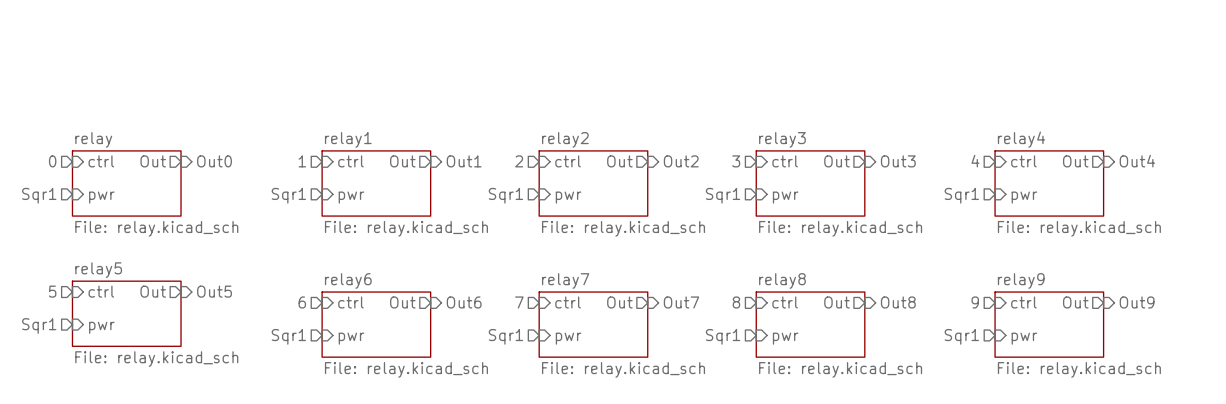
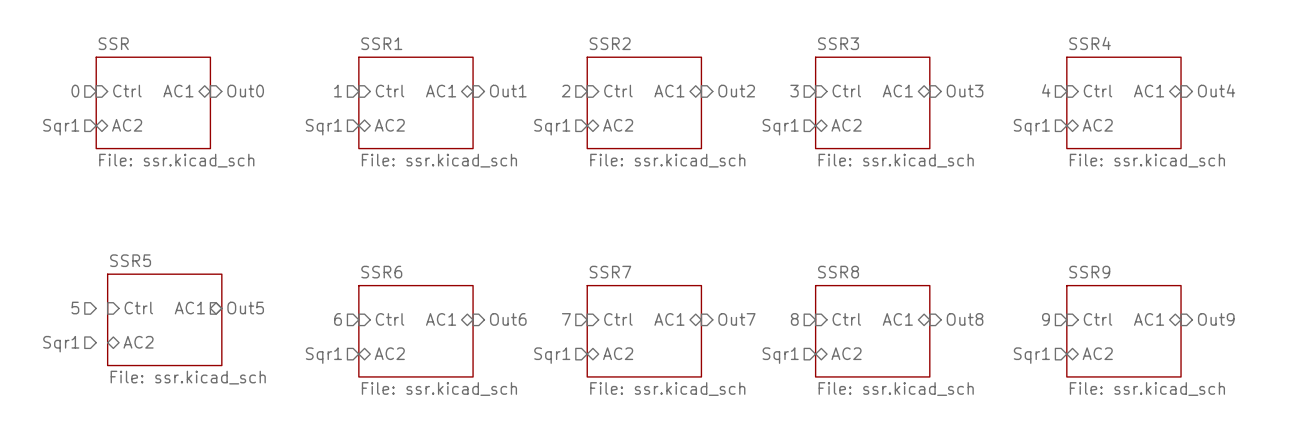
sheet pin: none -> Ctrl (127, 91)
sheet pin: none -> AC1 (178, 91)
sheet pin: none -> Ctrl (390, 91)
sheet pin: none -> AC1 (441, 91)
sheet pin: none -> Ctrl (618, 91)
sheet pin: none -> AC1 (669, 91)
sheet pin: none -> Ctrl (846, 91)
sheet pin: none -> AC1 (897, 91)
sheet pin: none -> Ctrl (1098, 91)
sheet pin: none -> AC1 (1149, 91)
sheet SSR: none -> File: ssr.kicad_sch (153, 102)
sheet SSR1: none -> File: ssr.kicad_sch (415, 102)
sheet SSR2: none -> File: ssr.kicad_sch (644, 102)
sheet SSR3: none -> File: ssr.kicad_sch (872, 102)
sheet SSR4: none -> File: ssr.kicad_sch (1123, 102)
sheet pin: none -> AC2 (127, 125)
sheet pin: none -> AC2 (389, 125)
sheet pin: none -> AC2 (618, 125)
sheet pin: none -> AC2 (846, 125)
sheet pin: none -> AC2 (1097, 125)
hierarchical label position: 0 (52, 161) -> 0 (75, 91)
sheet pin: ctrl (101, 161) -> none
sheet pin: Out (153, 161) -> none
hierarchical label position: Out0 (214, 161) -> Out0 (245, 91)
hierarchical label position: 1 (302, 161) -> 1 (338, 91)
sheet pin: ctrl (350, 161) -> none
sheet pin: Out (402, 161) -> none
hierarchical label position: Out1 (464, 161) -> Out1 (508, 91)
hierarchical label position: 2 (519, 161) -> 2 (566, 91)
sheet pin: ctrl (568, 161) -> none
sheet pin: Out (619, 161) -> none
hierarchical label position: Out2 (681, 161) -> Out2 (736, 91)
hierarchical label position: 3 (736, 161) -> 3 (794, 91)
sheet pin: ctrl (785, 161) -> none
sheet pin: Out (836, 161) -> none
hierarchical label position: Out3 (898, 161) -> Out3 (965, 91)
hierarchical label position: 4 (975, 161) -> 4 (1046, 90)
sheet pin: ctrl (1023, 161) -> none
sheet pin: Out (1075, 161) -> none
hierarchical label position: Out4 (1137, 161) -> Out4 (1216, 90)
sheet relay: File: relay.kicad_sch (126, 183) -> none
sheet relay1: File: relay.kicad_sch (376, 183) -> none
sheet relay2: File: relay.kicad_sch (593, 183) -> none
sheet relay3: File: relay.kicad_sch (810, 183) -> none
sheet relay4: File: relay.kicad_sch (1049, 183) -> none
hierarchical label position: Sqr1 (39, 195) -> Sqr1 (61, 127)
hierarchical label position: Sqr1 (288, 195) -> Sqr1 (323, 127)
hierarchical label position: Sqr1 (505, 195) -> Sqr1 (552, 127)
hierarchical label position: Sqr1 (723, 195) -> Sqr1 (780, 127)
hierarchical label position: Sqr1 (961, 195) -> Sqr1 (1031, 127)
sheet pin: pwr (101, 197) -> none
sheet pin: pwr (351, 197) -> none
sheet pin: pwr (568, 197) -> none
sheet pin: pwr (785, 197) -> none
sheet pin: pwr (1024, 197) -> none
sheet pin: ctrl (101, 291) -> Ctrl (138, 308)
sheet pin: Out (153, 291) -> none
sheet pin: none -> AC1 (189, 308)
sheet SSR5: none -> File: ssr.kicad_sch (164, 319)
sheet pin: ctrl (350, 302) -> Ctrl (390, 319)
sheet pin shape: output (402, 302) -> bidirectional (441, 319)
sheet pin: Out (402, 302) -> AC1 (441, 319)
sheet pin: ctrl (568, 302) -> Ctrl (618, 319)
sheet pin shape: output (619, 302) -> bidirectional (669, 319)
sheet pin: Out (619, 302) -> AC1 (669, 319)
sheet pin: ctrl (785, 302) -> Ctrl (846, 319)
sheet pin shape: output (836, 302) -> bidirectional (897, 319)
sheet pin: Out (836, 302) -> AC1 (897, 319)
sheet pin: ctrl (1023, 302) -> Ctrl (1098, 319)
sheet pin shape: output (1075, 302) -> bidirectional (1149, 319)
sheet pin: Out (1075, 302) -> AC1 (1149, 319)
sheet relay5: File: relay.kicad_sch (126, 313) -> none
sheet SSR6: none -> File: ssr.kicad_sch (415, 331)
sheet SSR7: none -> File: ssr.kicad_sch (644, 331)
sheet SSR8: none -> File: ssr.kicad_sch (872, 331)
sheet SSR9: none -> File: ssr.kicad_sch (1123, 331)
sheet pin: none -> AC2 (138, 342)
sheet relay6: File: relay.kicad_sch (376, 324) -> none
sheet relay7: File: relay.kicad_sch (593, 324) -> none
sheet relay8: File: relay.kicad_sch (810, 324) -> none
sheet relay9: File: relay.kicad_sch (1049, 324) -> none
sheet pin: pwr (101, 327) -> none
sheet pin shape: input (351, 338) -> bidirectional (389, 353)
sheet pin: pwr (351, 338) -> AC2 (389, 353)
sheet pin shape: input (568, 338) -> bidirectional (618, 353)
sheet pin: pwr (568, 338) -> AC2 (618, 353)
sheet pin shape: input (785, 338) -> bidirectional (846, 353)
sheet pin: pwr (785, 338) -> AC2 (846, 353)
sheet pin shape: input (1024, 338) -> bidirectional (1097, 353)
sheet pin: pwr (1024, 338) -> AC2 (1097, 353)

